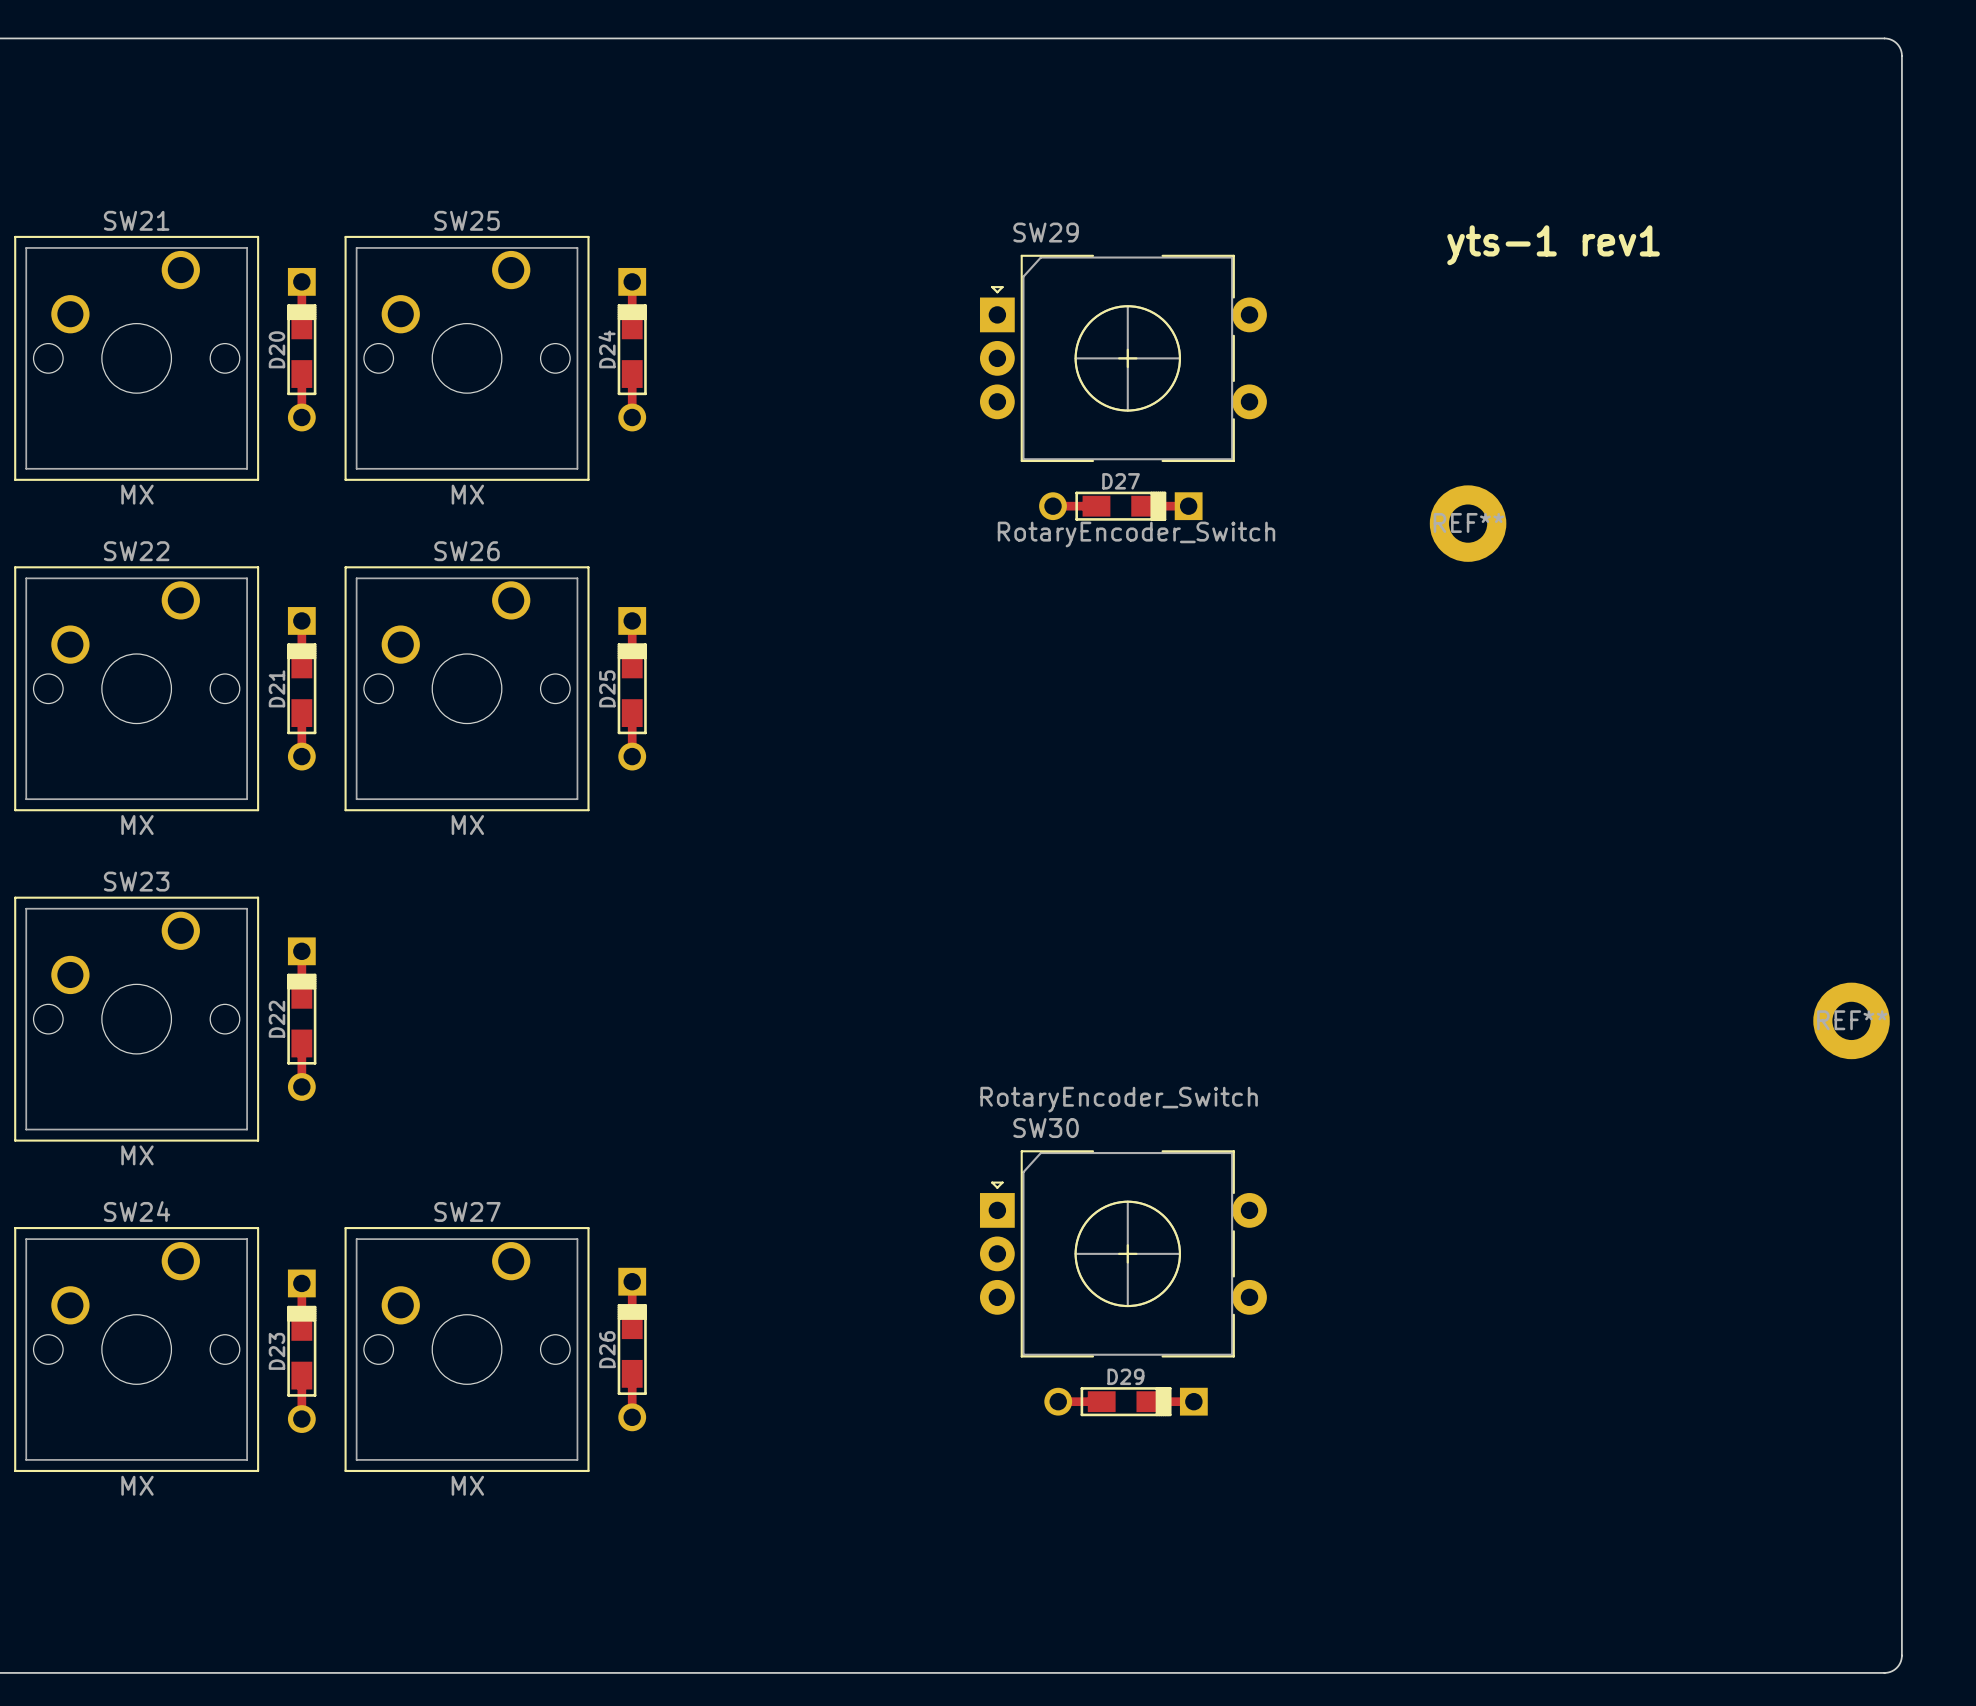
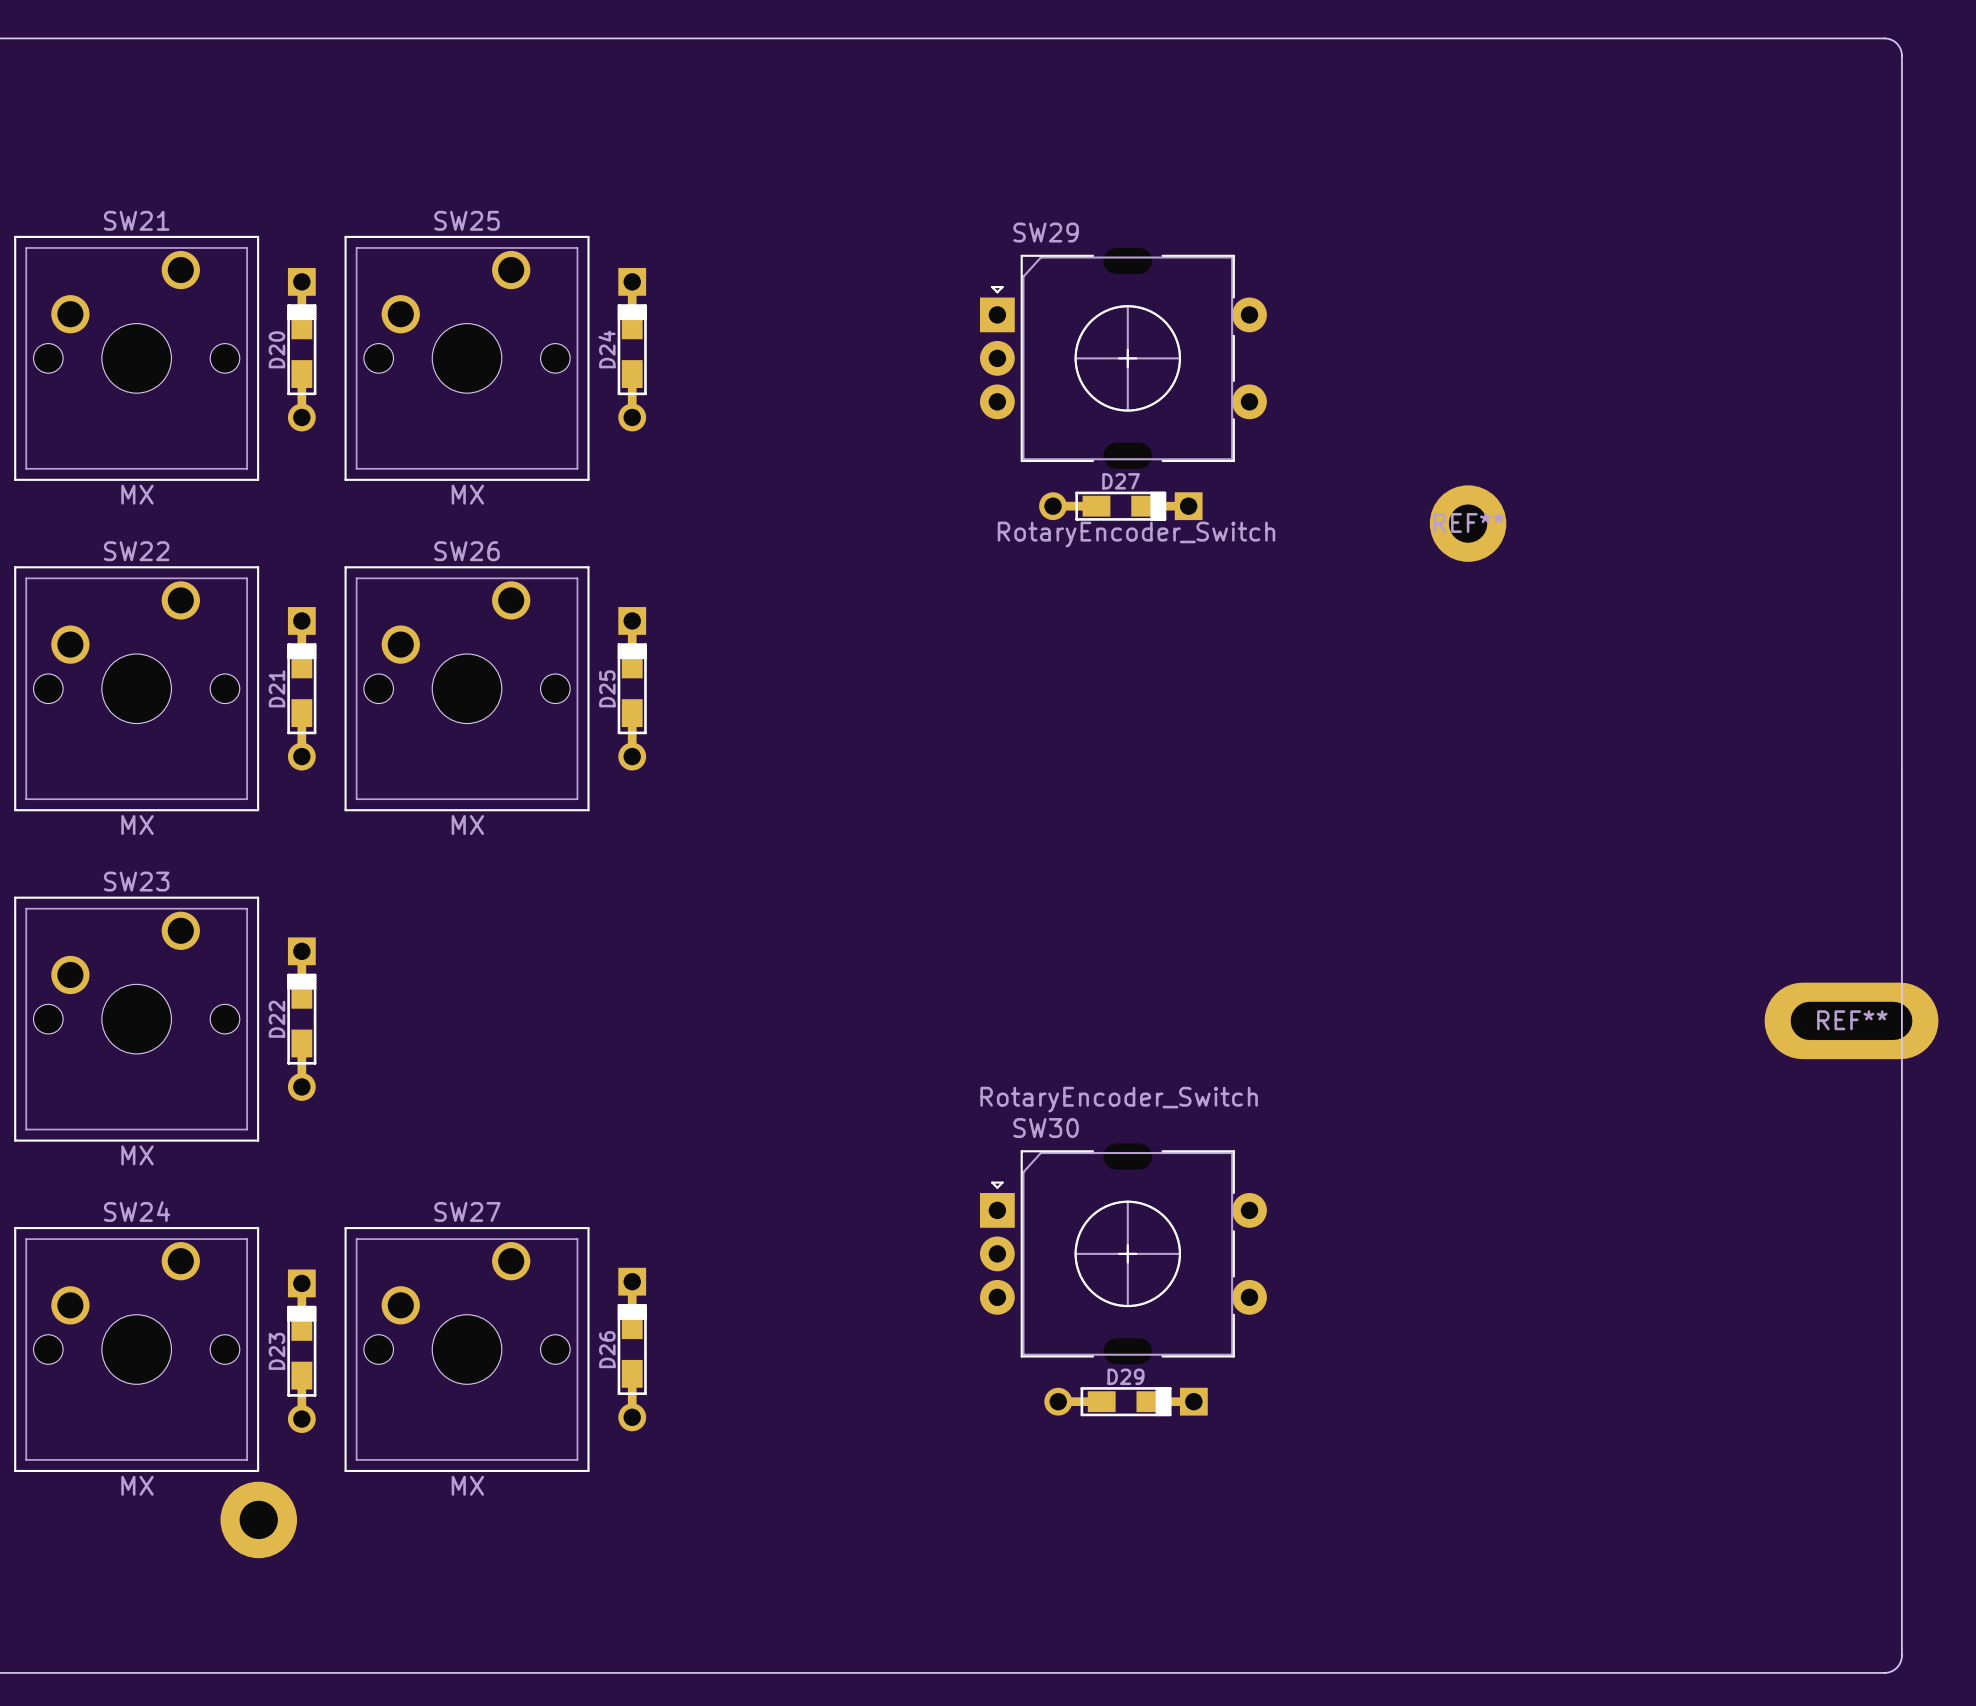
text: yts-1 rev1 (1553, 245) -> none
REF** footprint: [1813, 982, 1890, 1060] -> [1764, 982, 1939, 1060]
part: none -> (258, 1519)

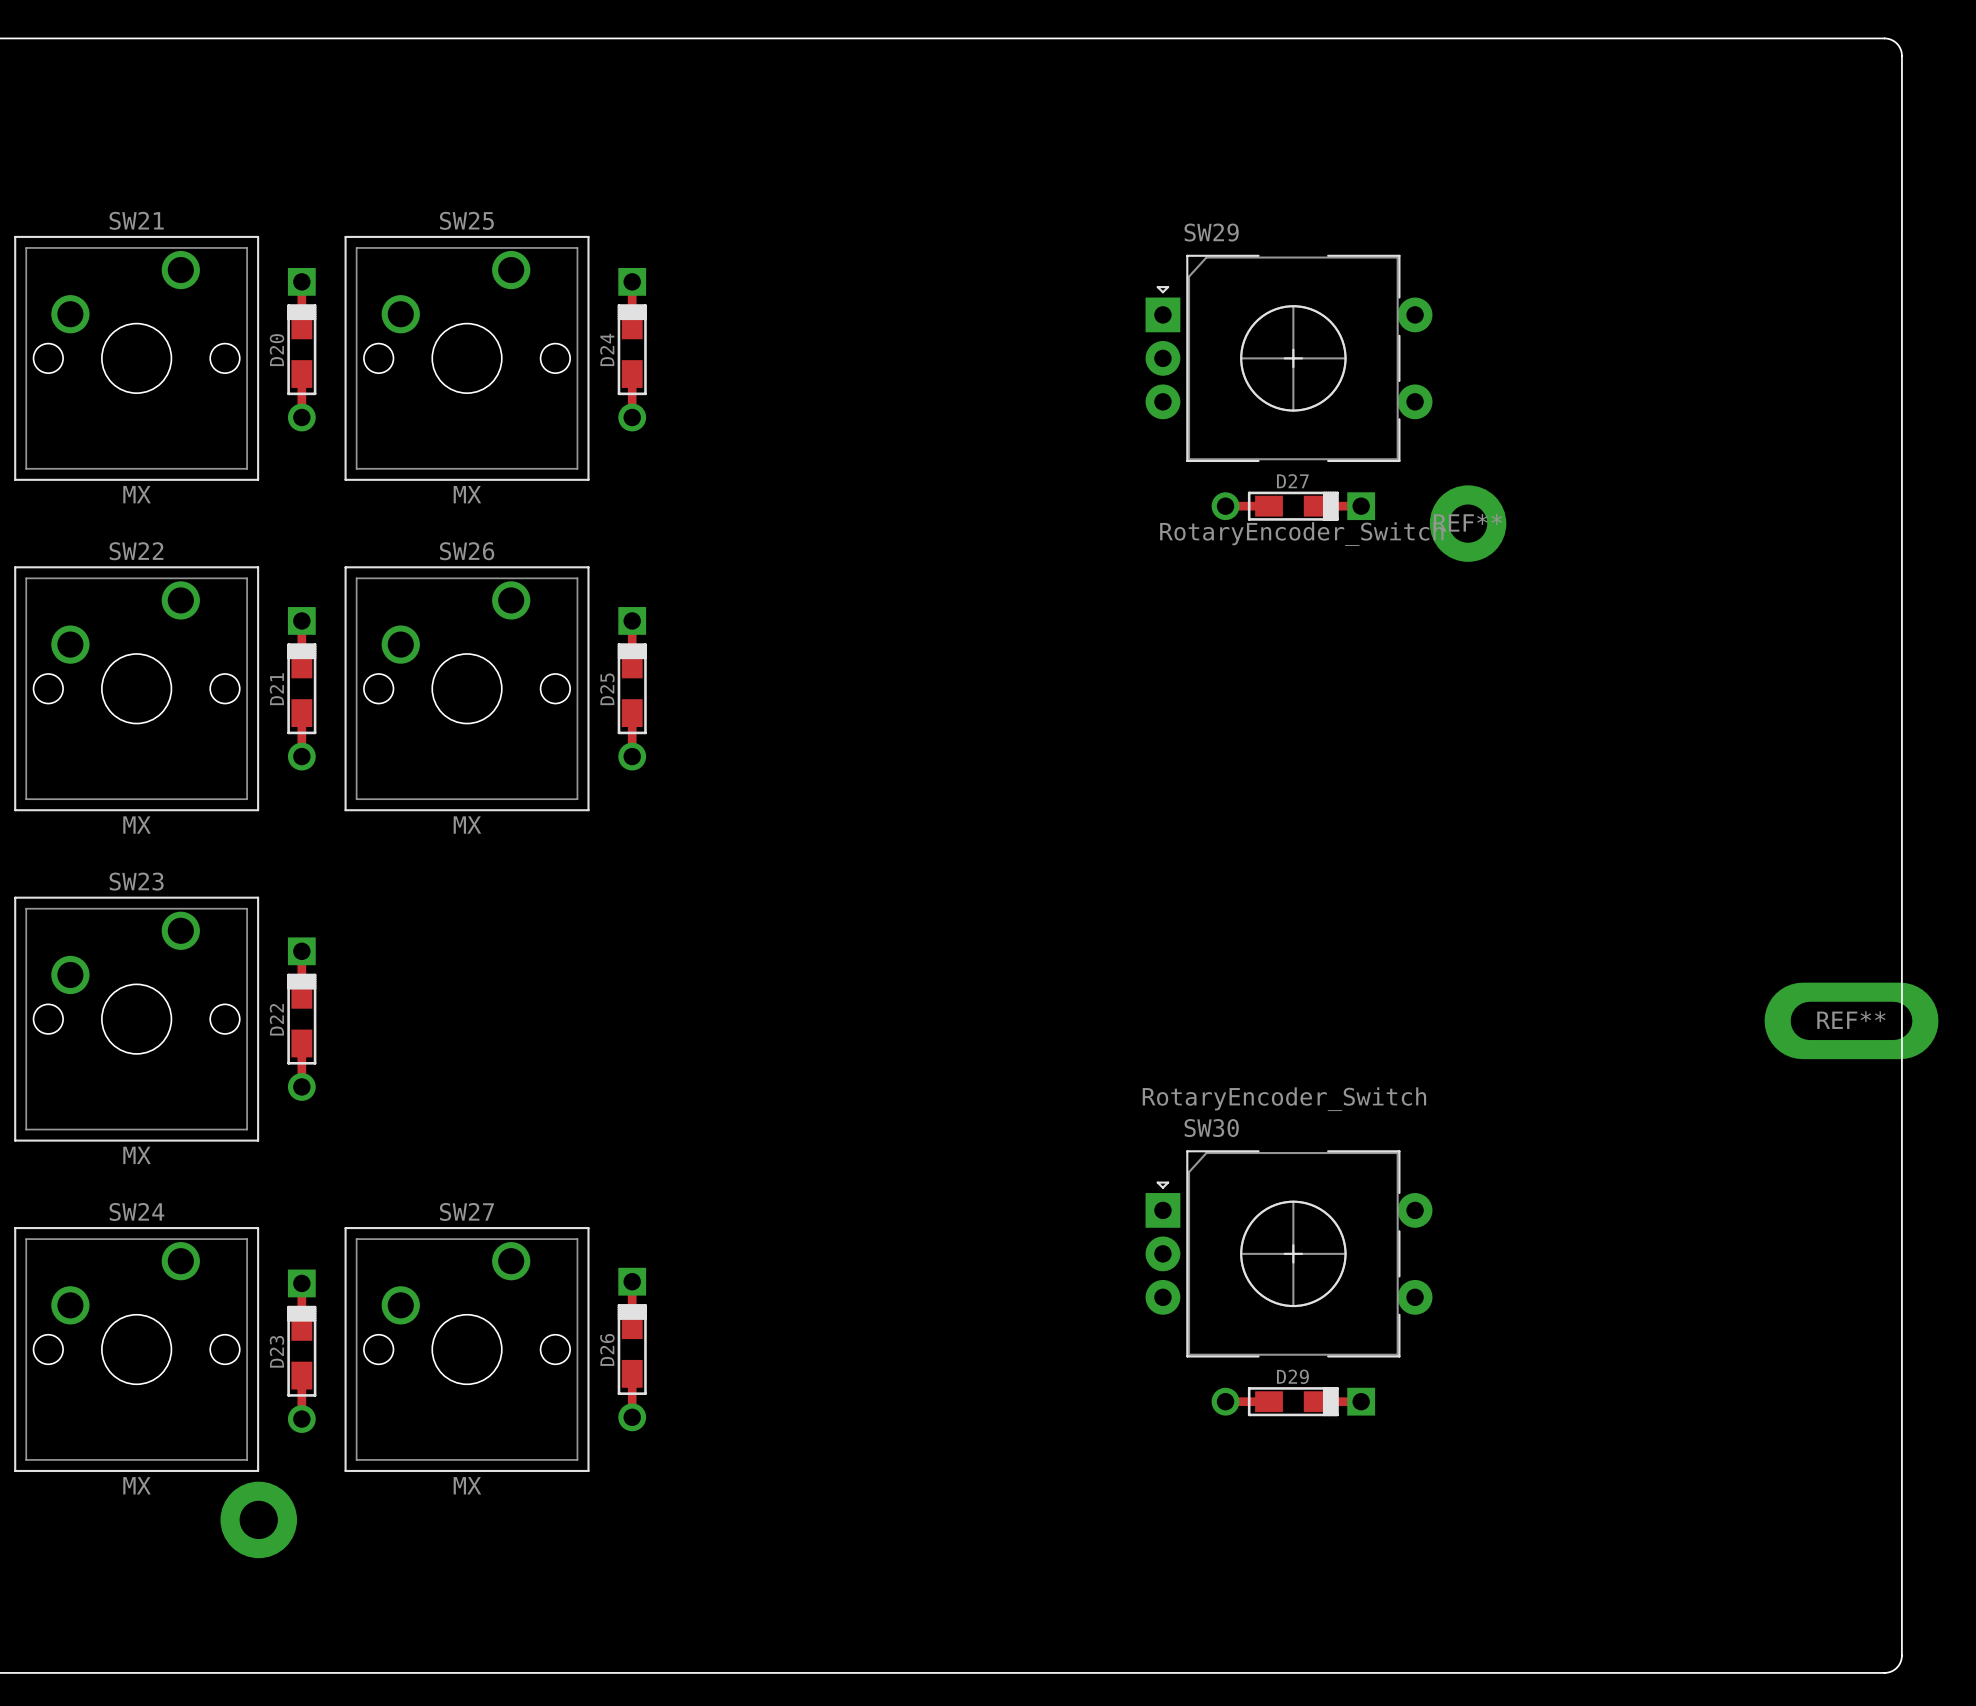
SW29 position: (1123, 358) -> (1289, 358)
D27 position: (1120, 506) -> (1293, 506)
SW30 position: (1123, 1253) -> (1289, 1253)
D29 position: (1126, 1401) -> (1293, 1401)

